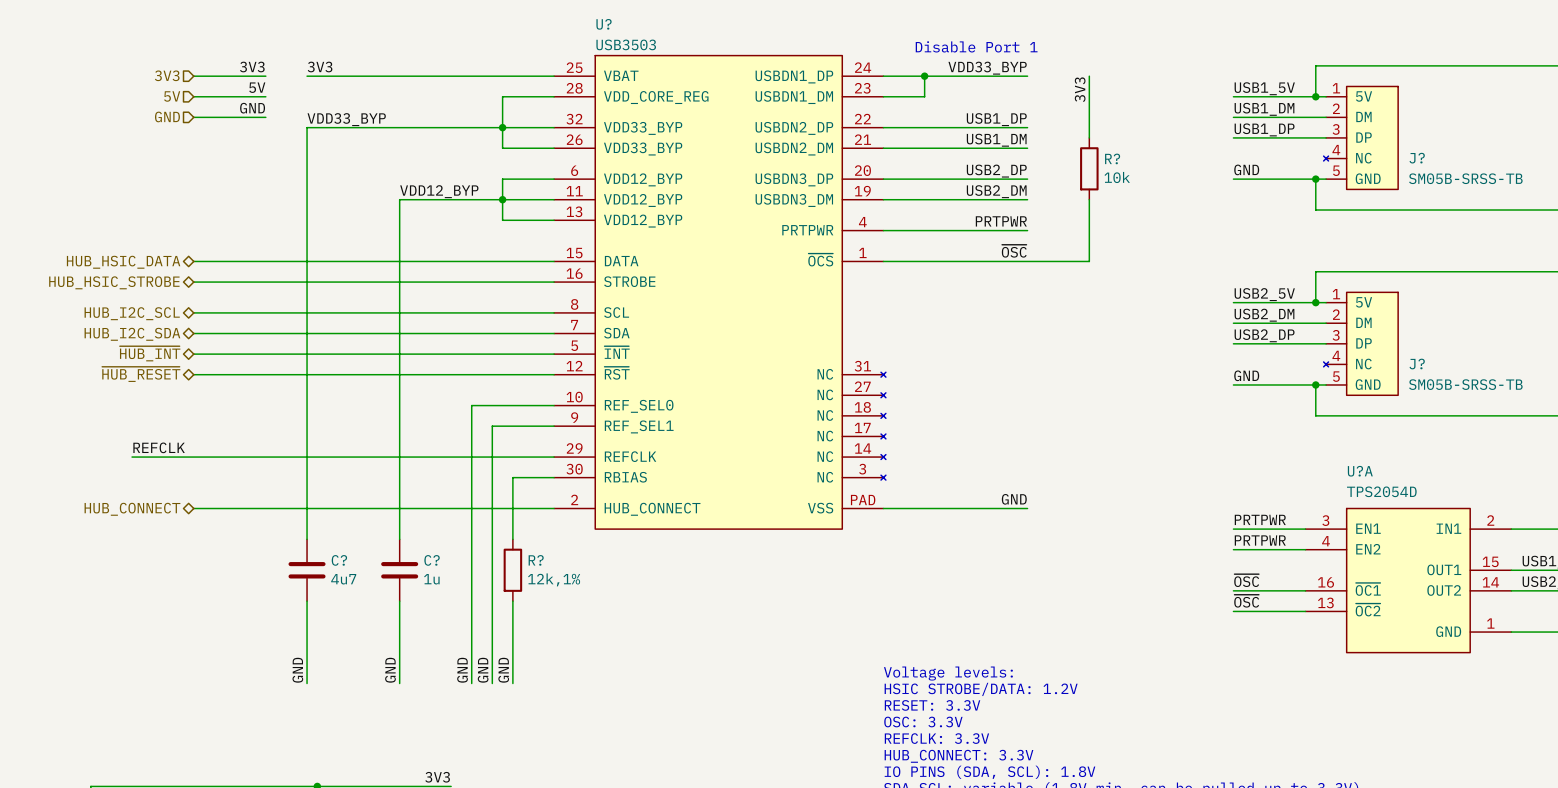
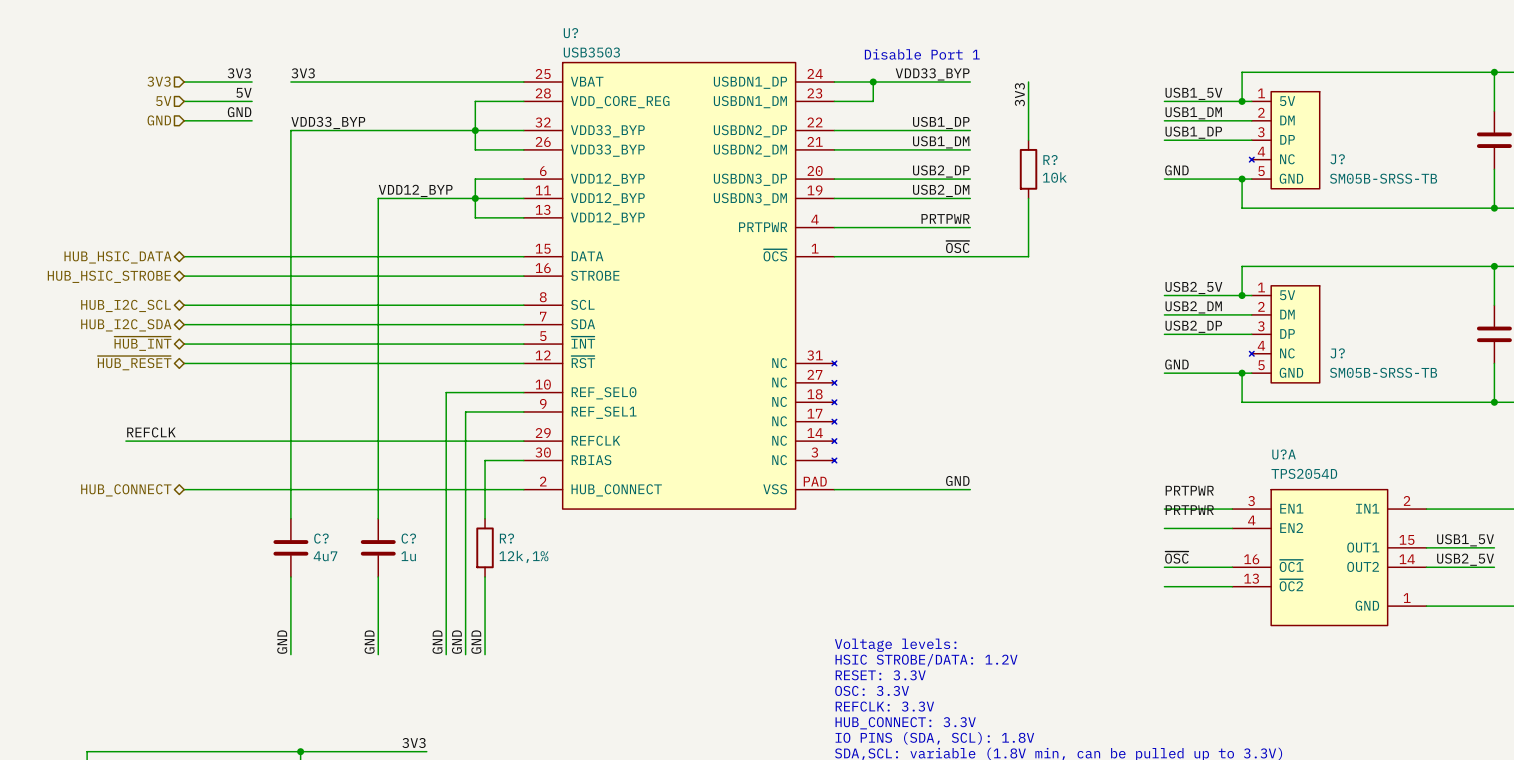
label: none -> PRTPWR (1189, 490)
label: PRTPWR (1260, 519) -> none
label: none -> PRTPWR (1189, 510)
label: PRTPWR (1260, 540) -> none
label: ~{OSC} (1246, 601) -> none

